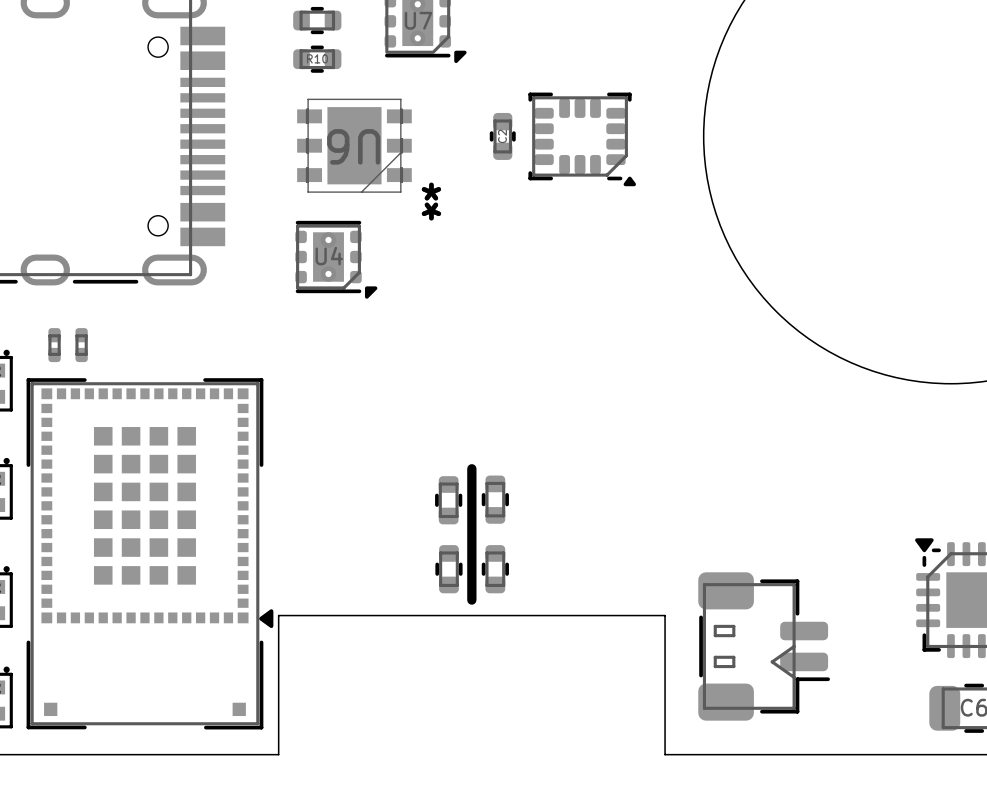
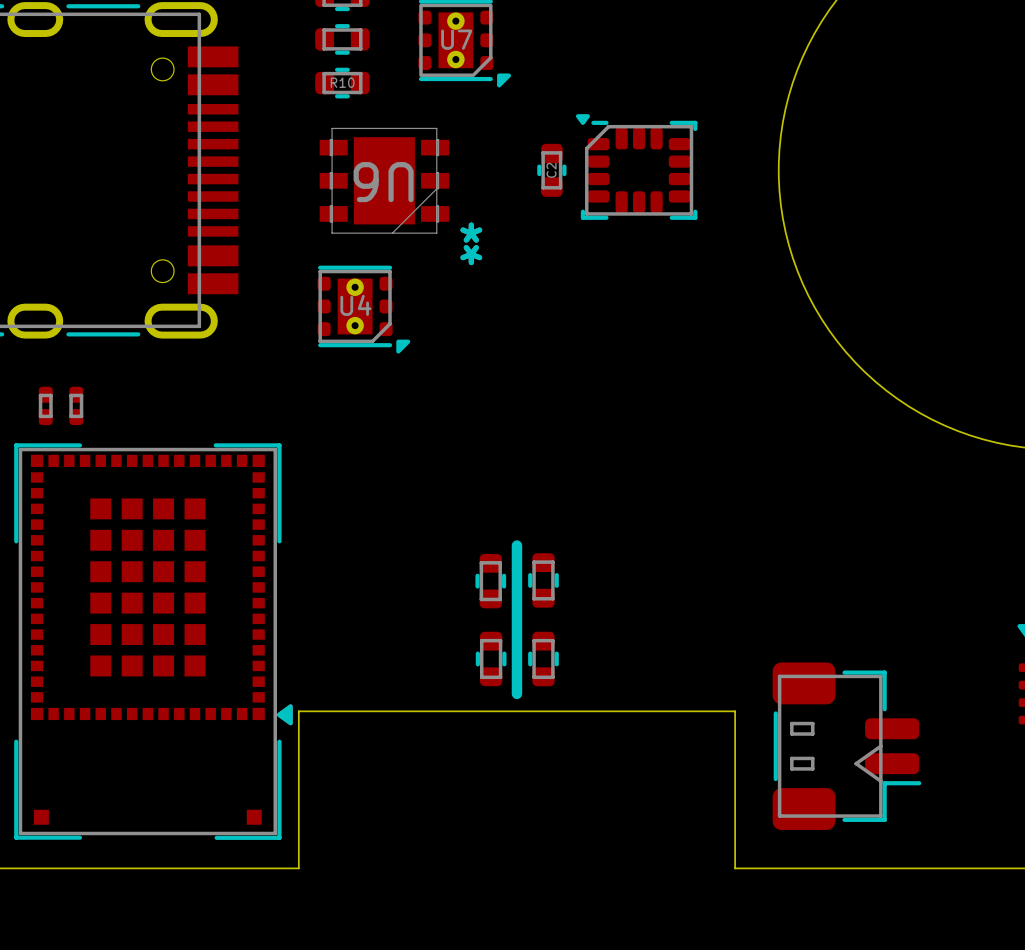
part rotation: 0° (582, 139) -> 180° (636, 167)

